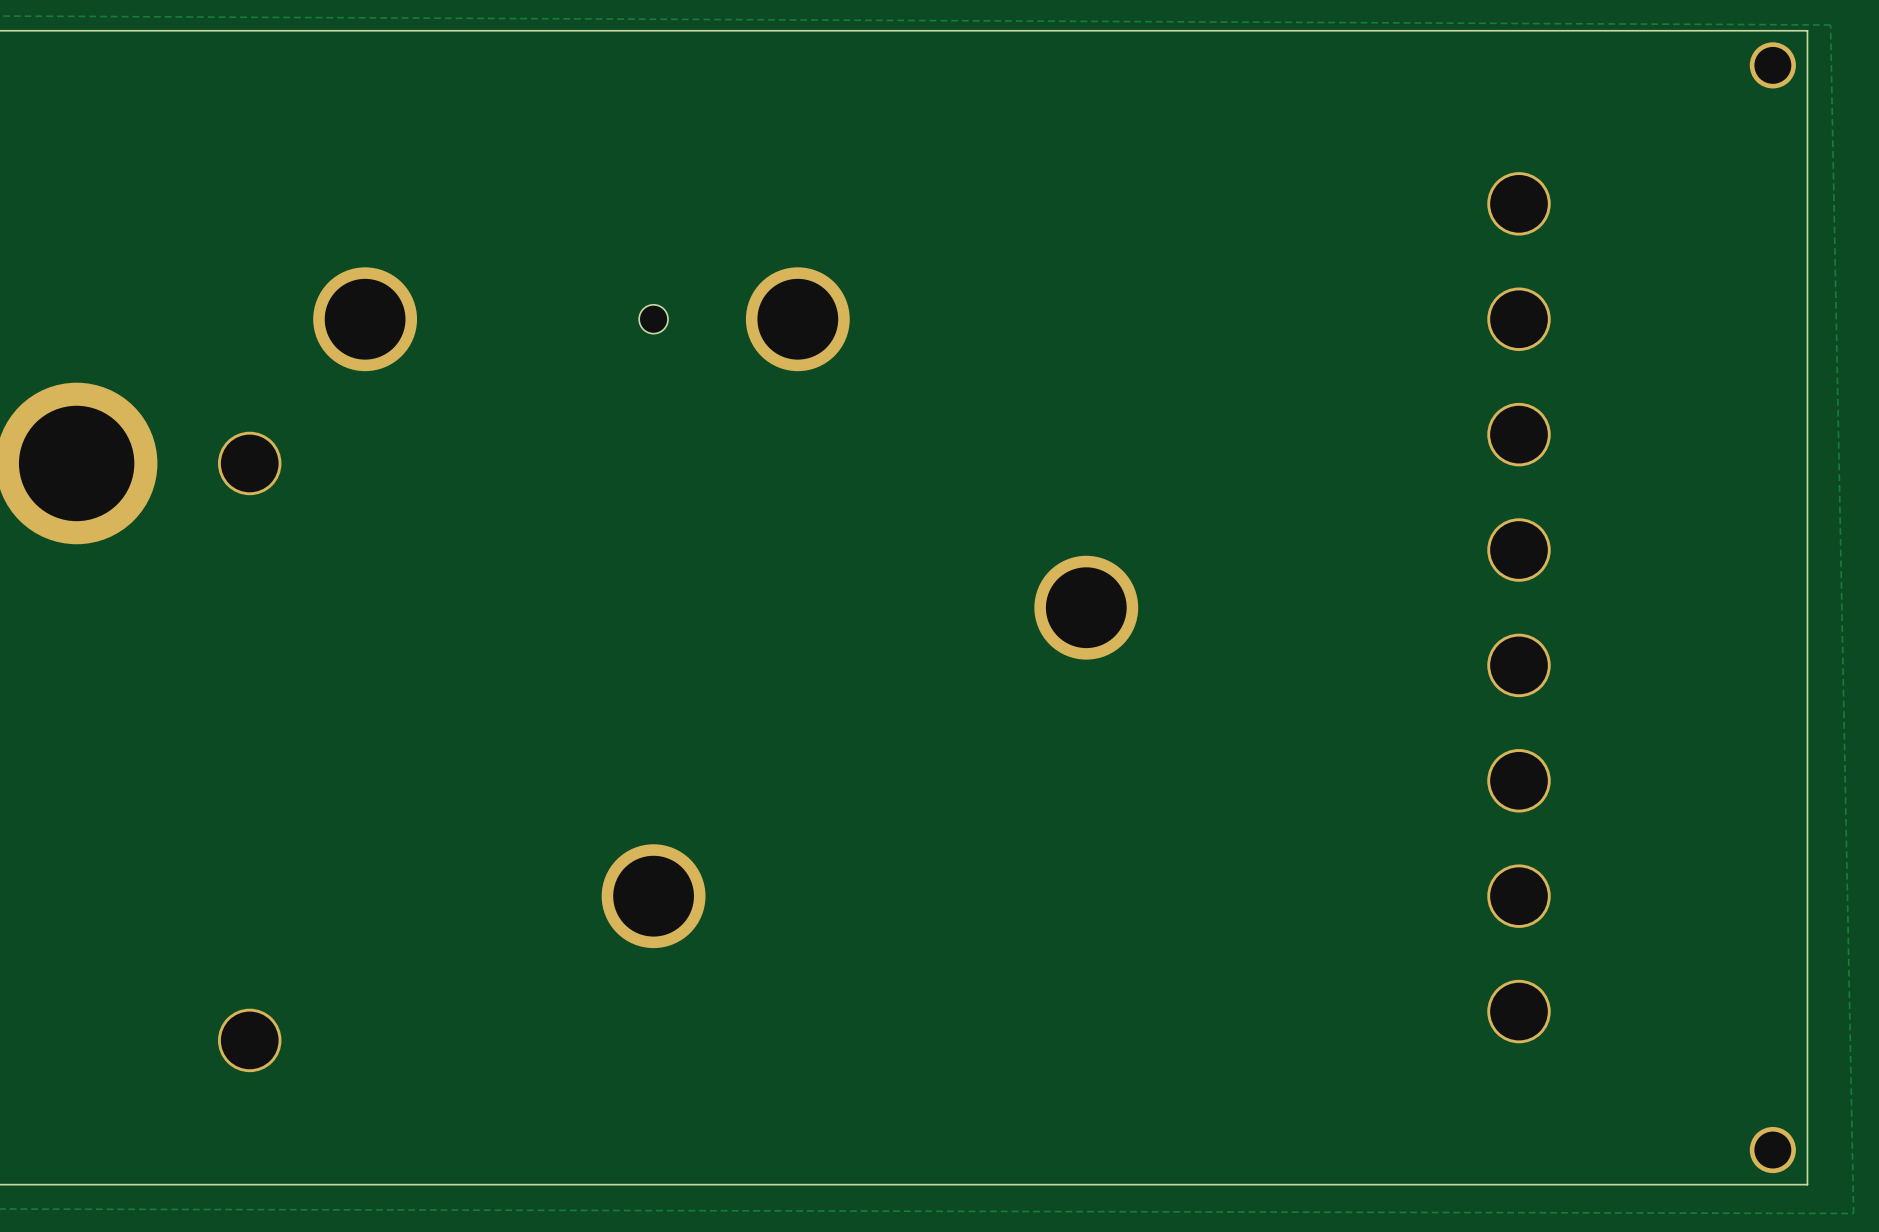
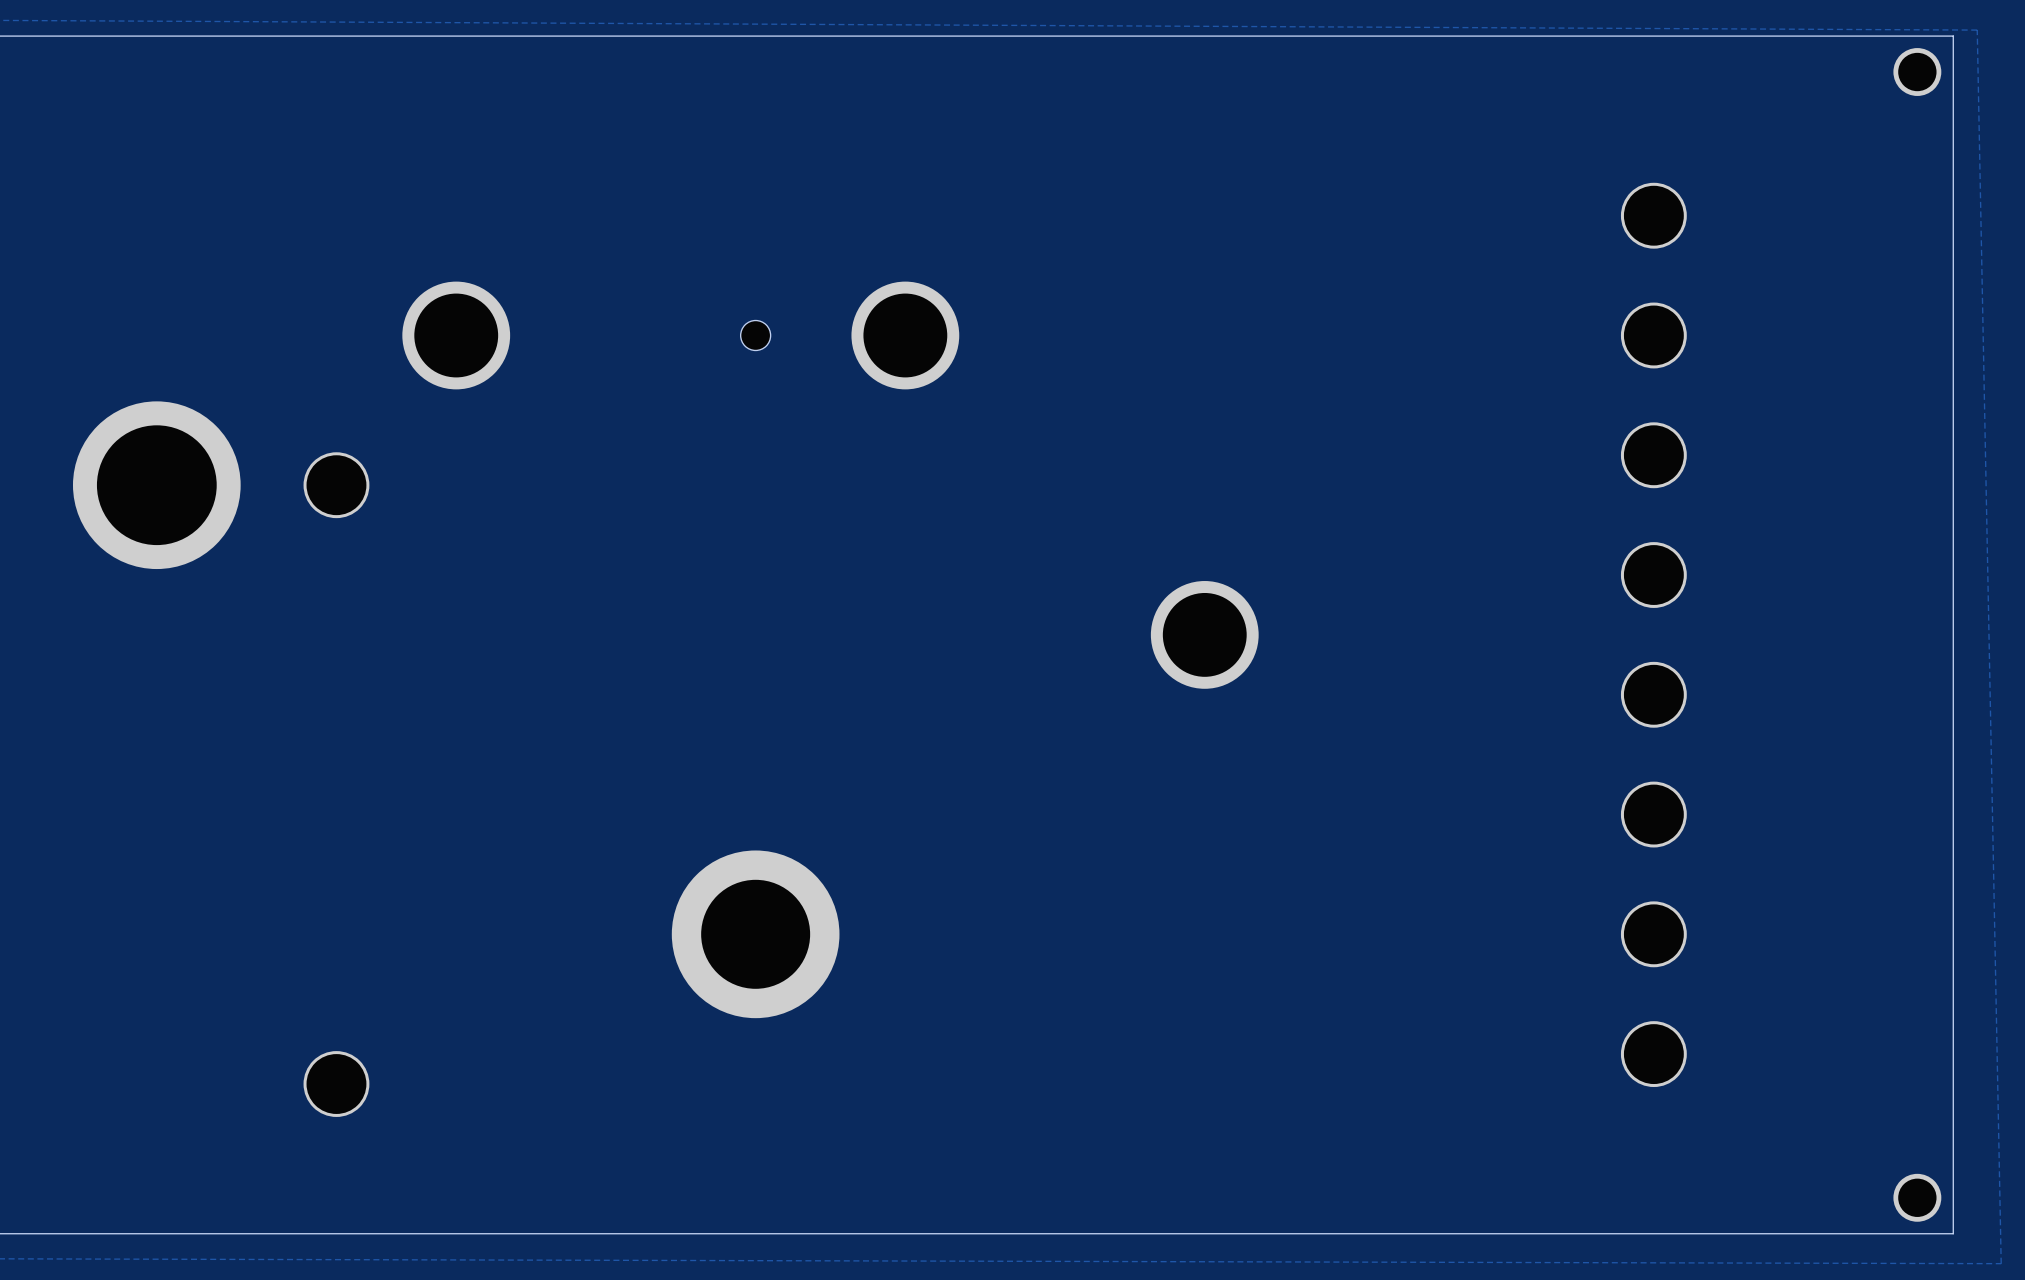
part footprint: [601, 844, 706, 949] -> [671, 850, 840, 1019]

